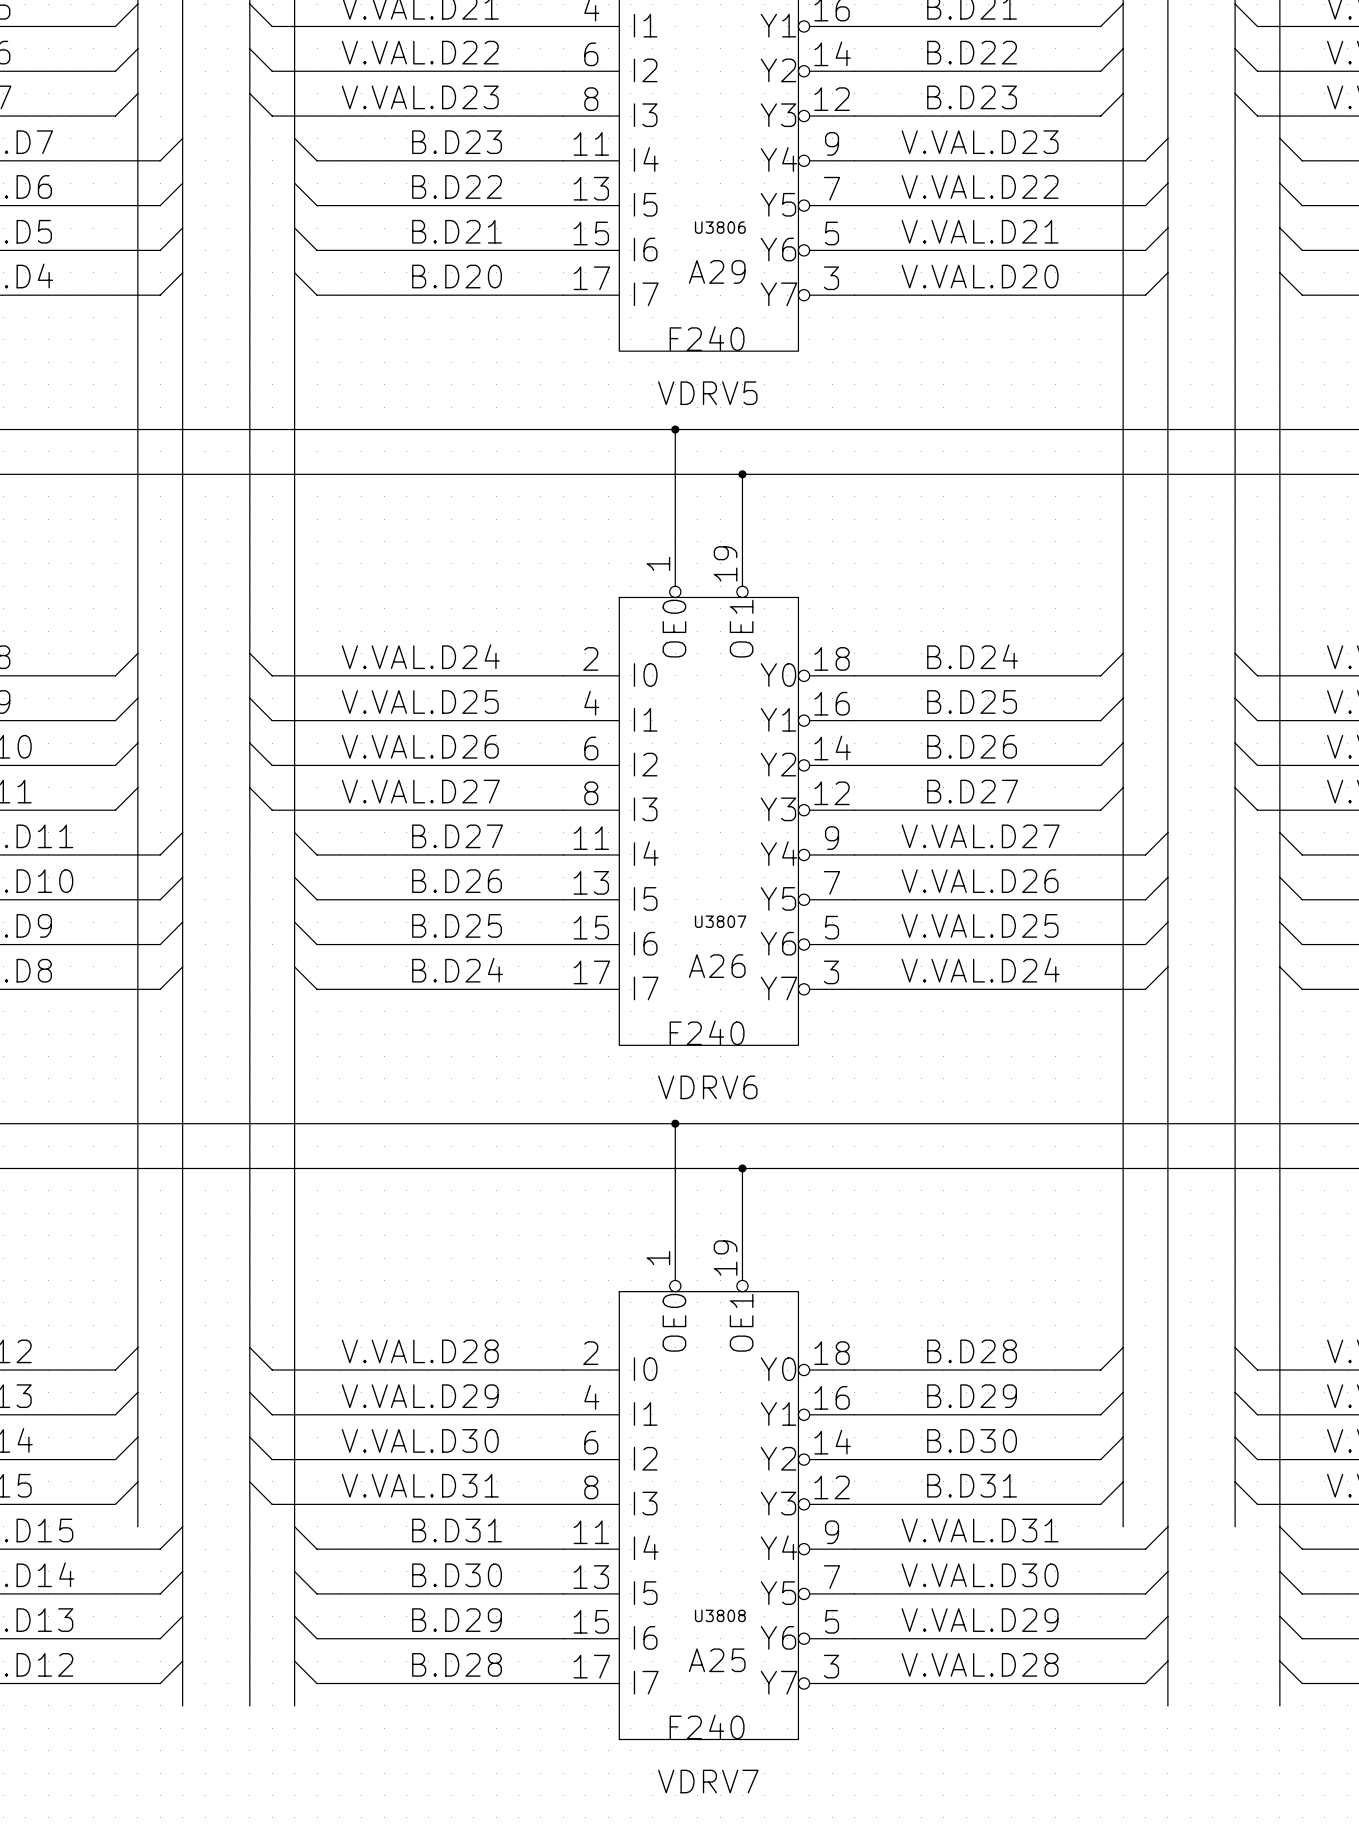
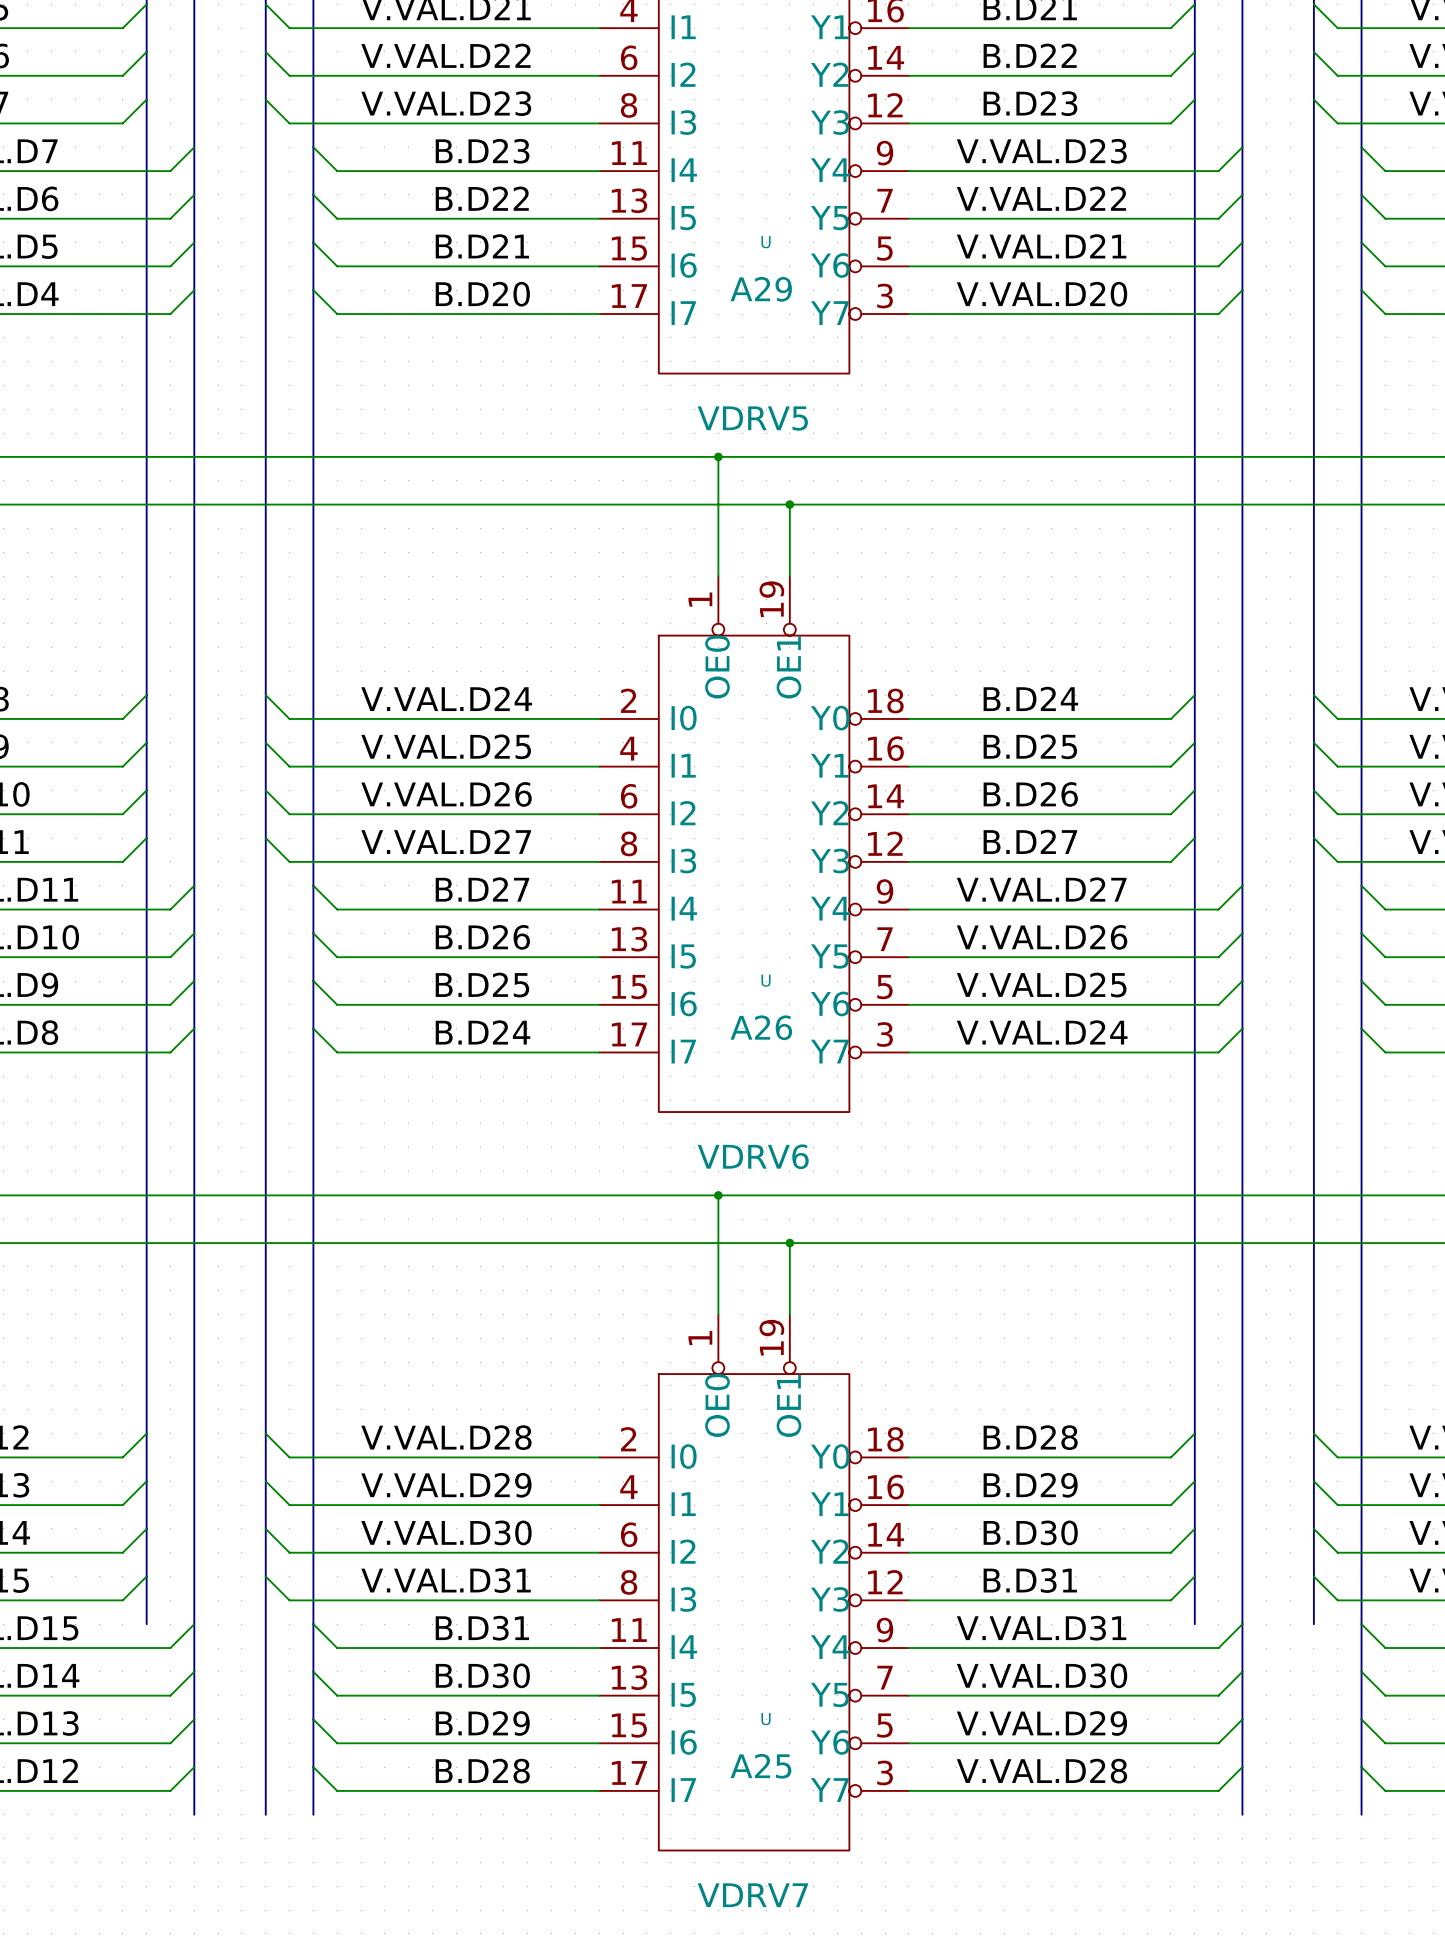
U3806 name: U3806 (720, 227) -> U (766, 242)
U3806 value: F240 (707, 338) -> none
U3807 name: U3807 (720, 921) -> U (766, 980)
U3807 value: F240 (707, 1032) -> none
U3808 name: U3808 (720, 1615) -> U (766, 1719)
U3808 value: F240 (707, 1726) -> none

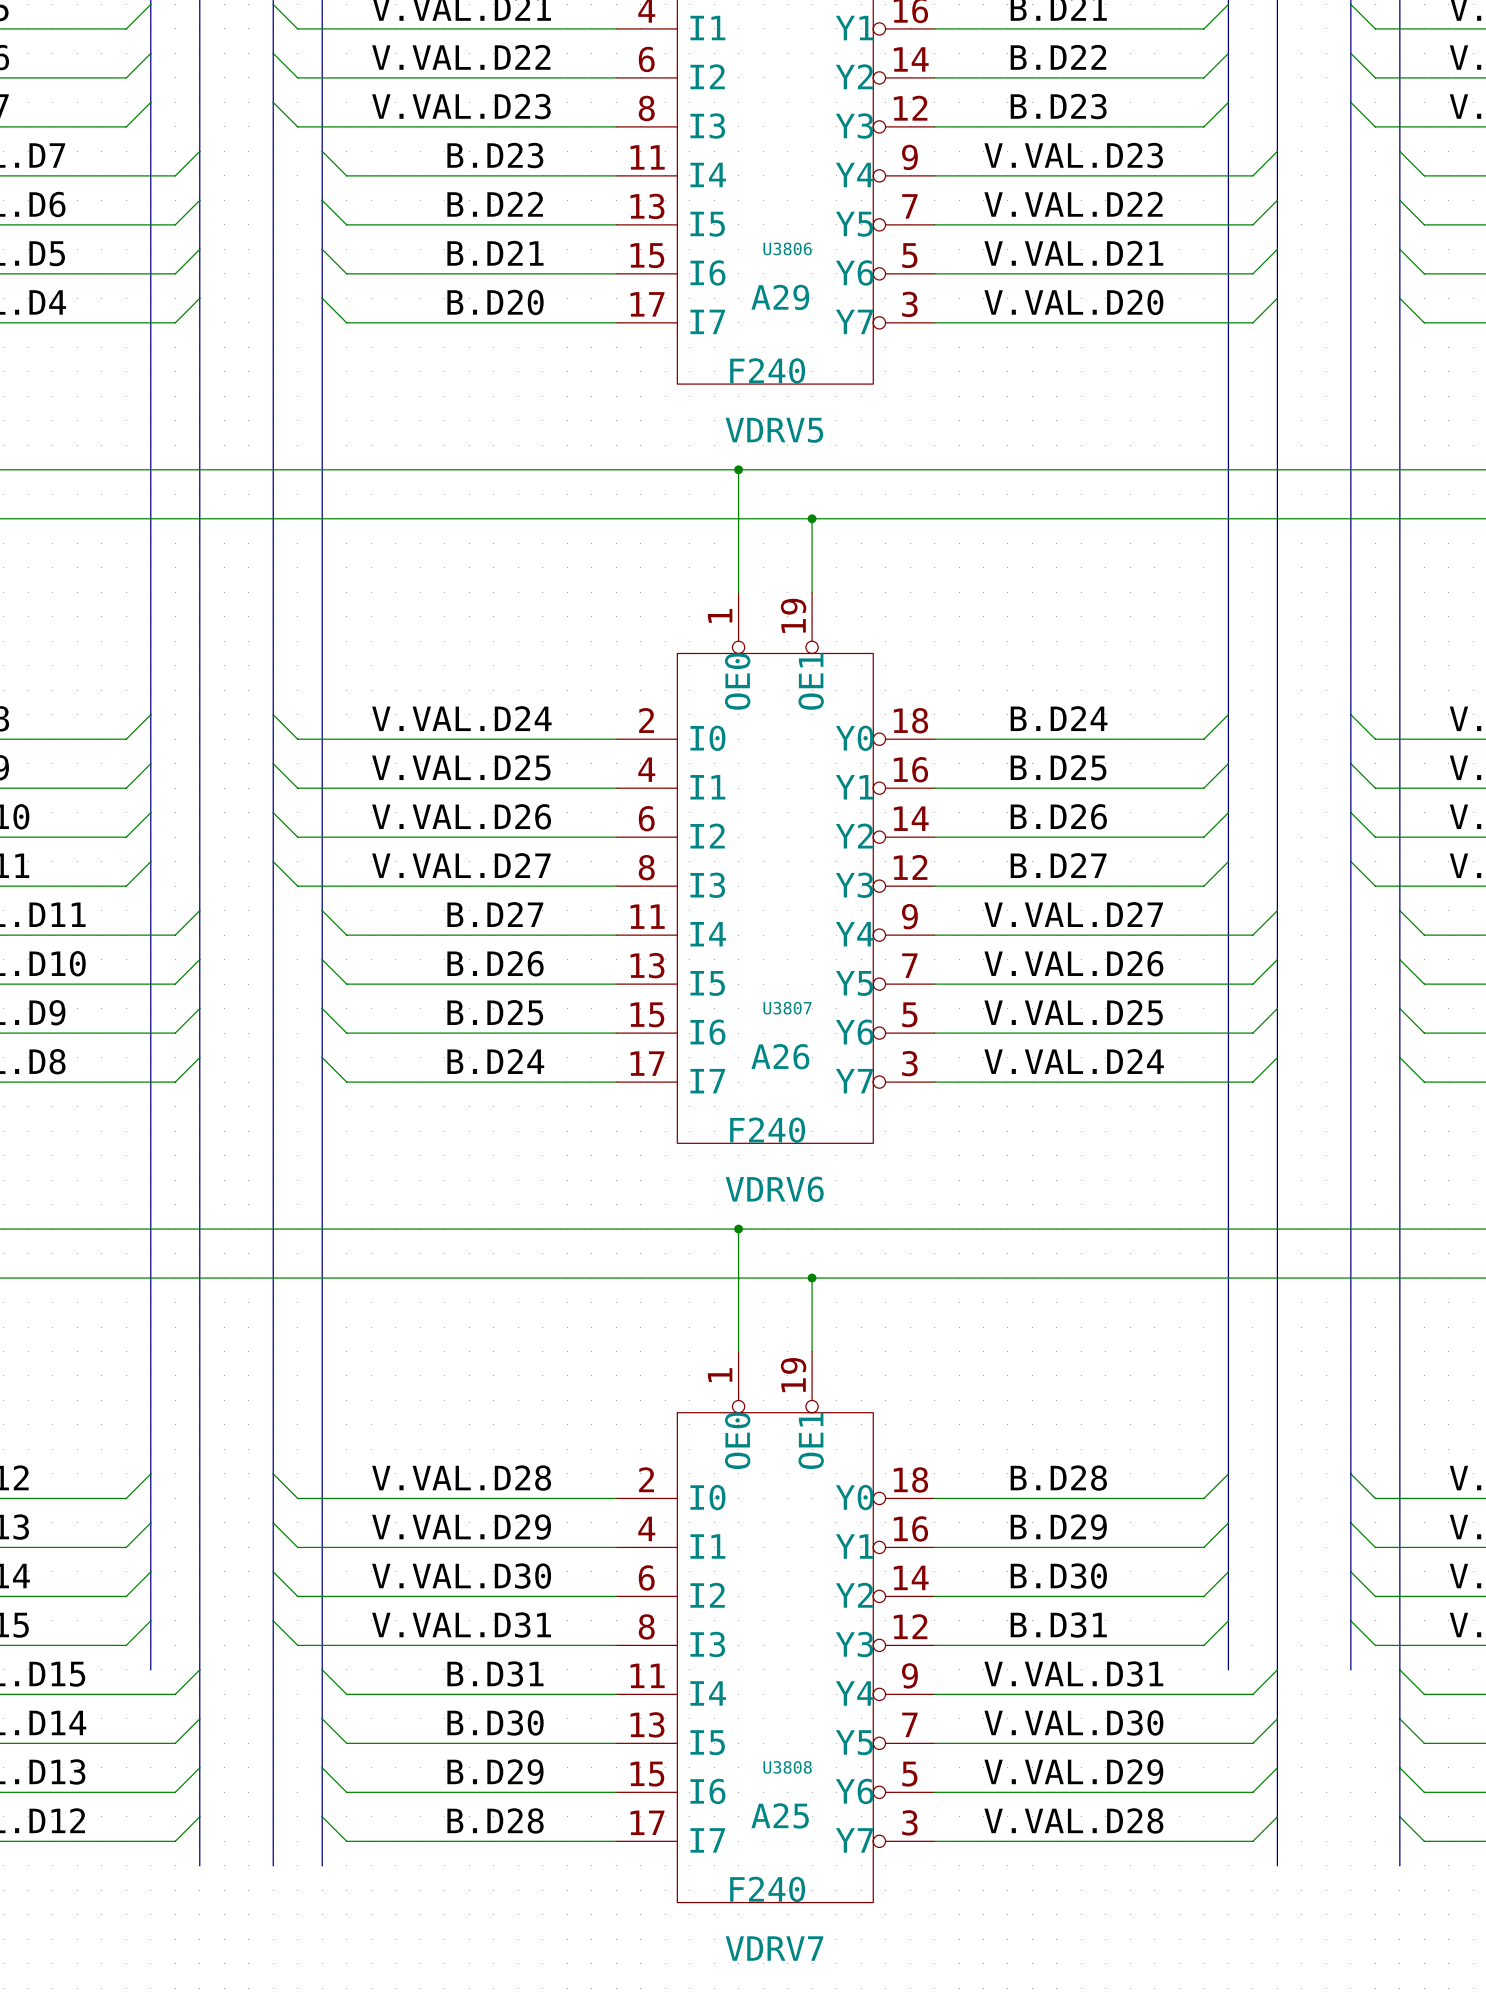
U name: U (766, 242) -> U3806 (787, 248)
U value: none -> F240 (767, 370)
U name: U (766, 980) -> U3807 (787, 1008)
U value: none -> F240 (767, 1130)
U name: U (766, 1719) -> U3808 (787, 1767)
U value: none -> F240 (767, 1889)

